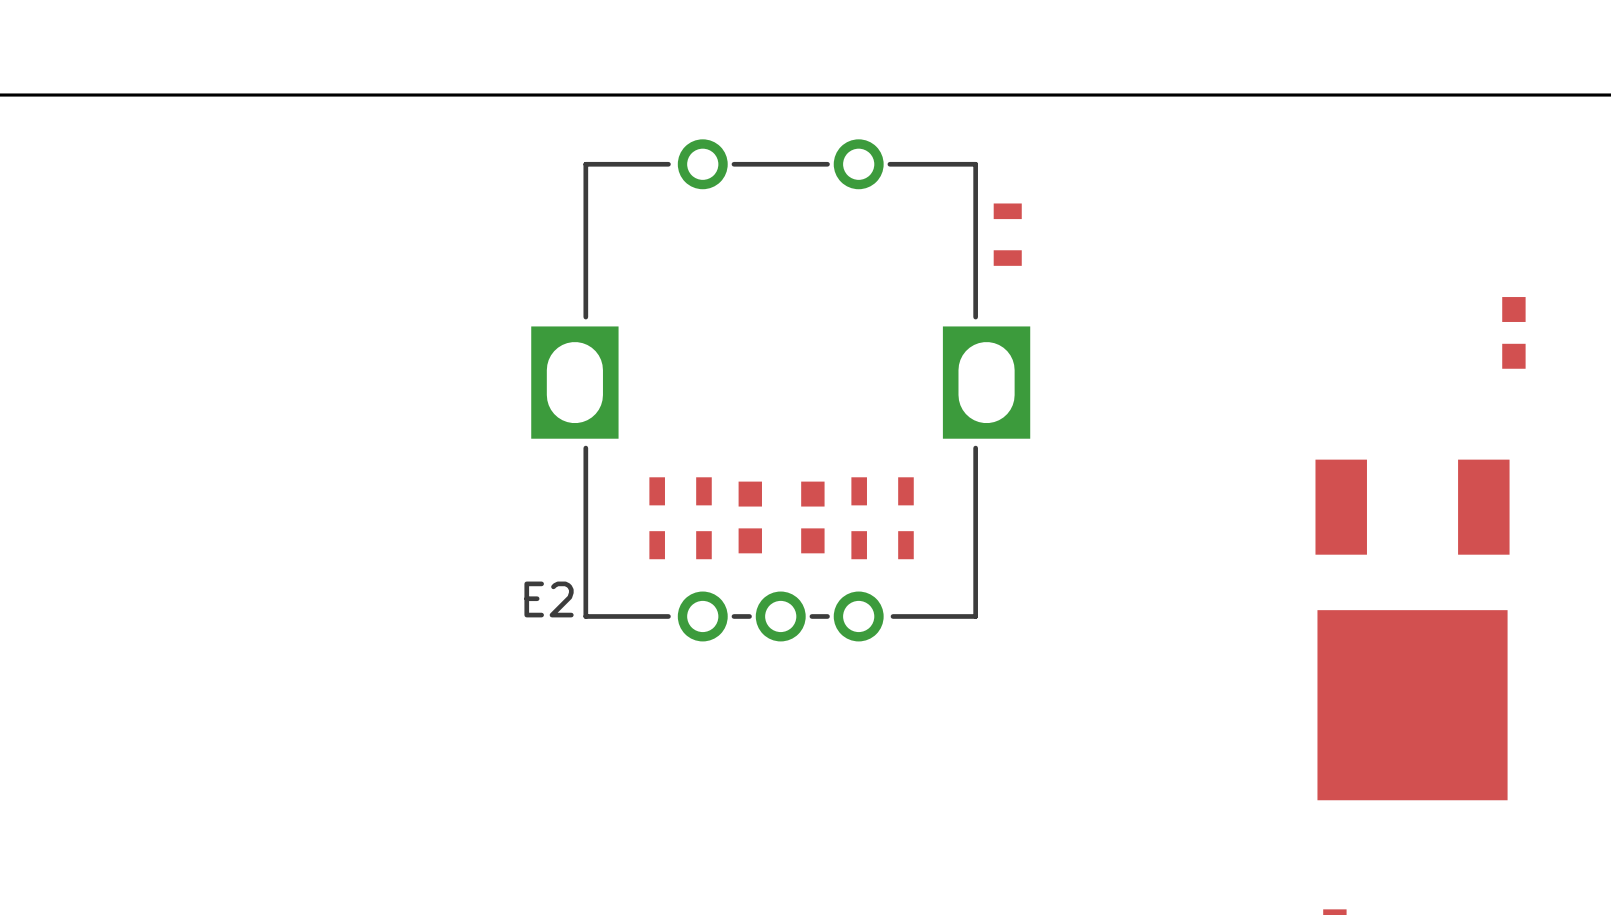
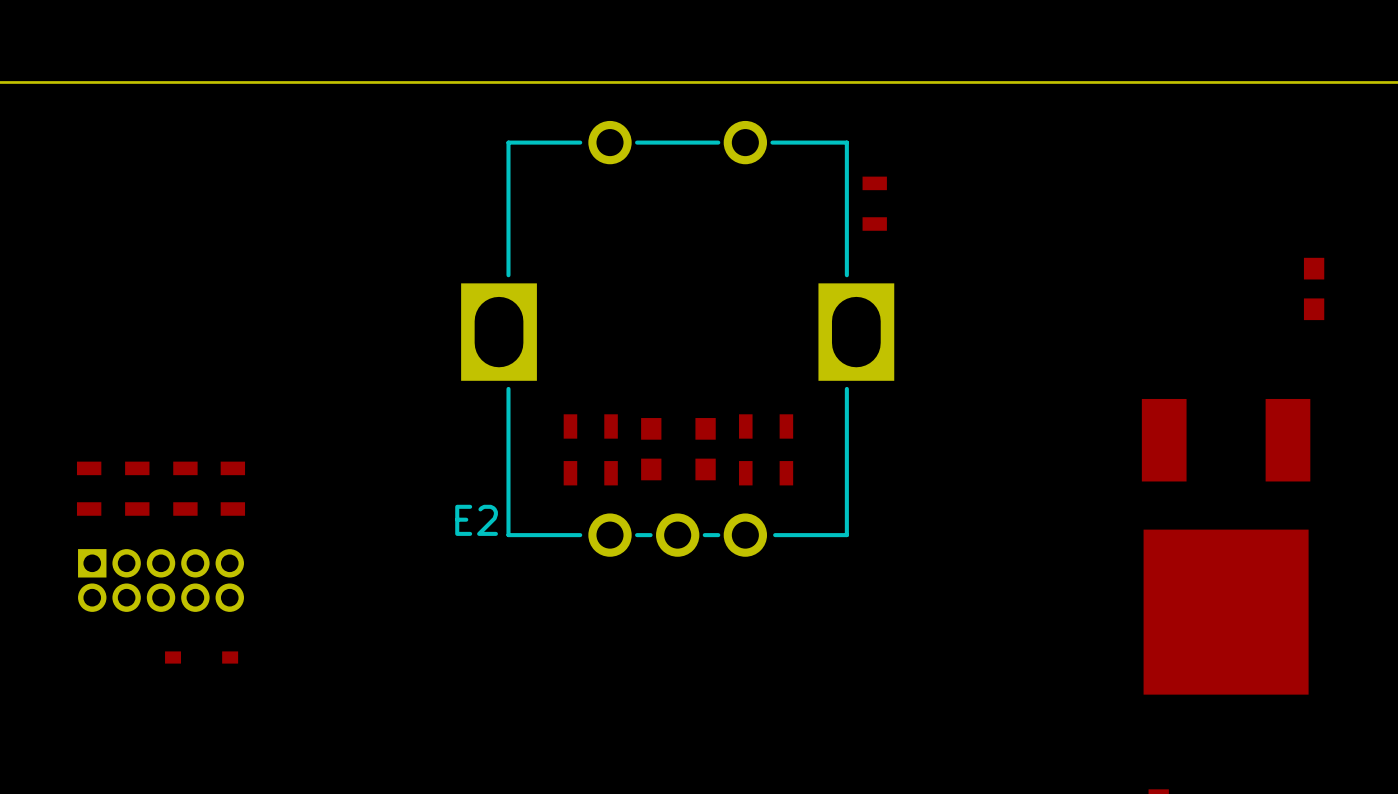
part: none -> (89, 488)
part: none -> (137, 488)
part: none -> (185, 488)
part: none -> (232, 488)
part: none -> (161, 580)
part: none -> (201, 657)

